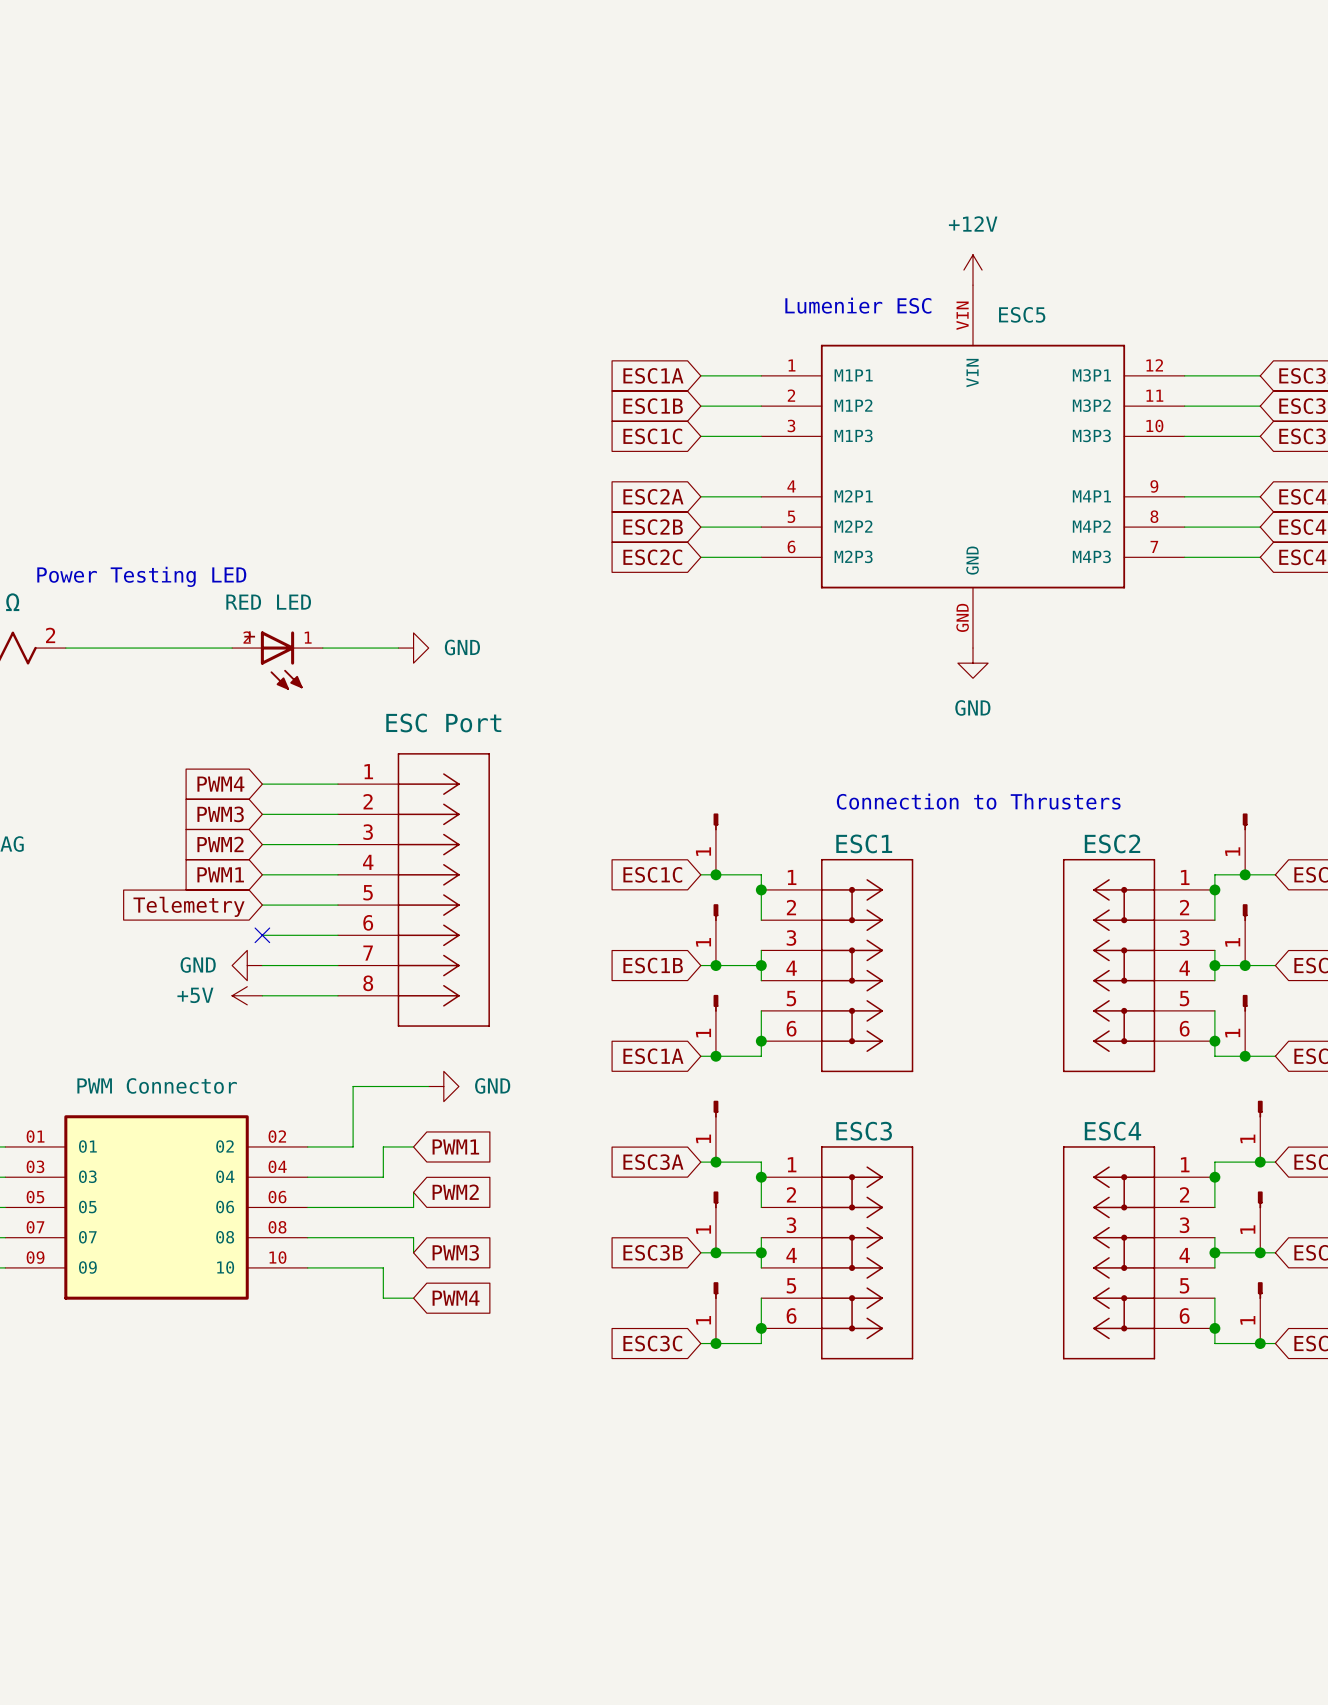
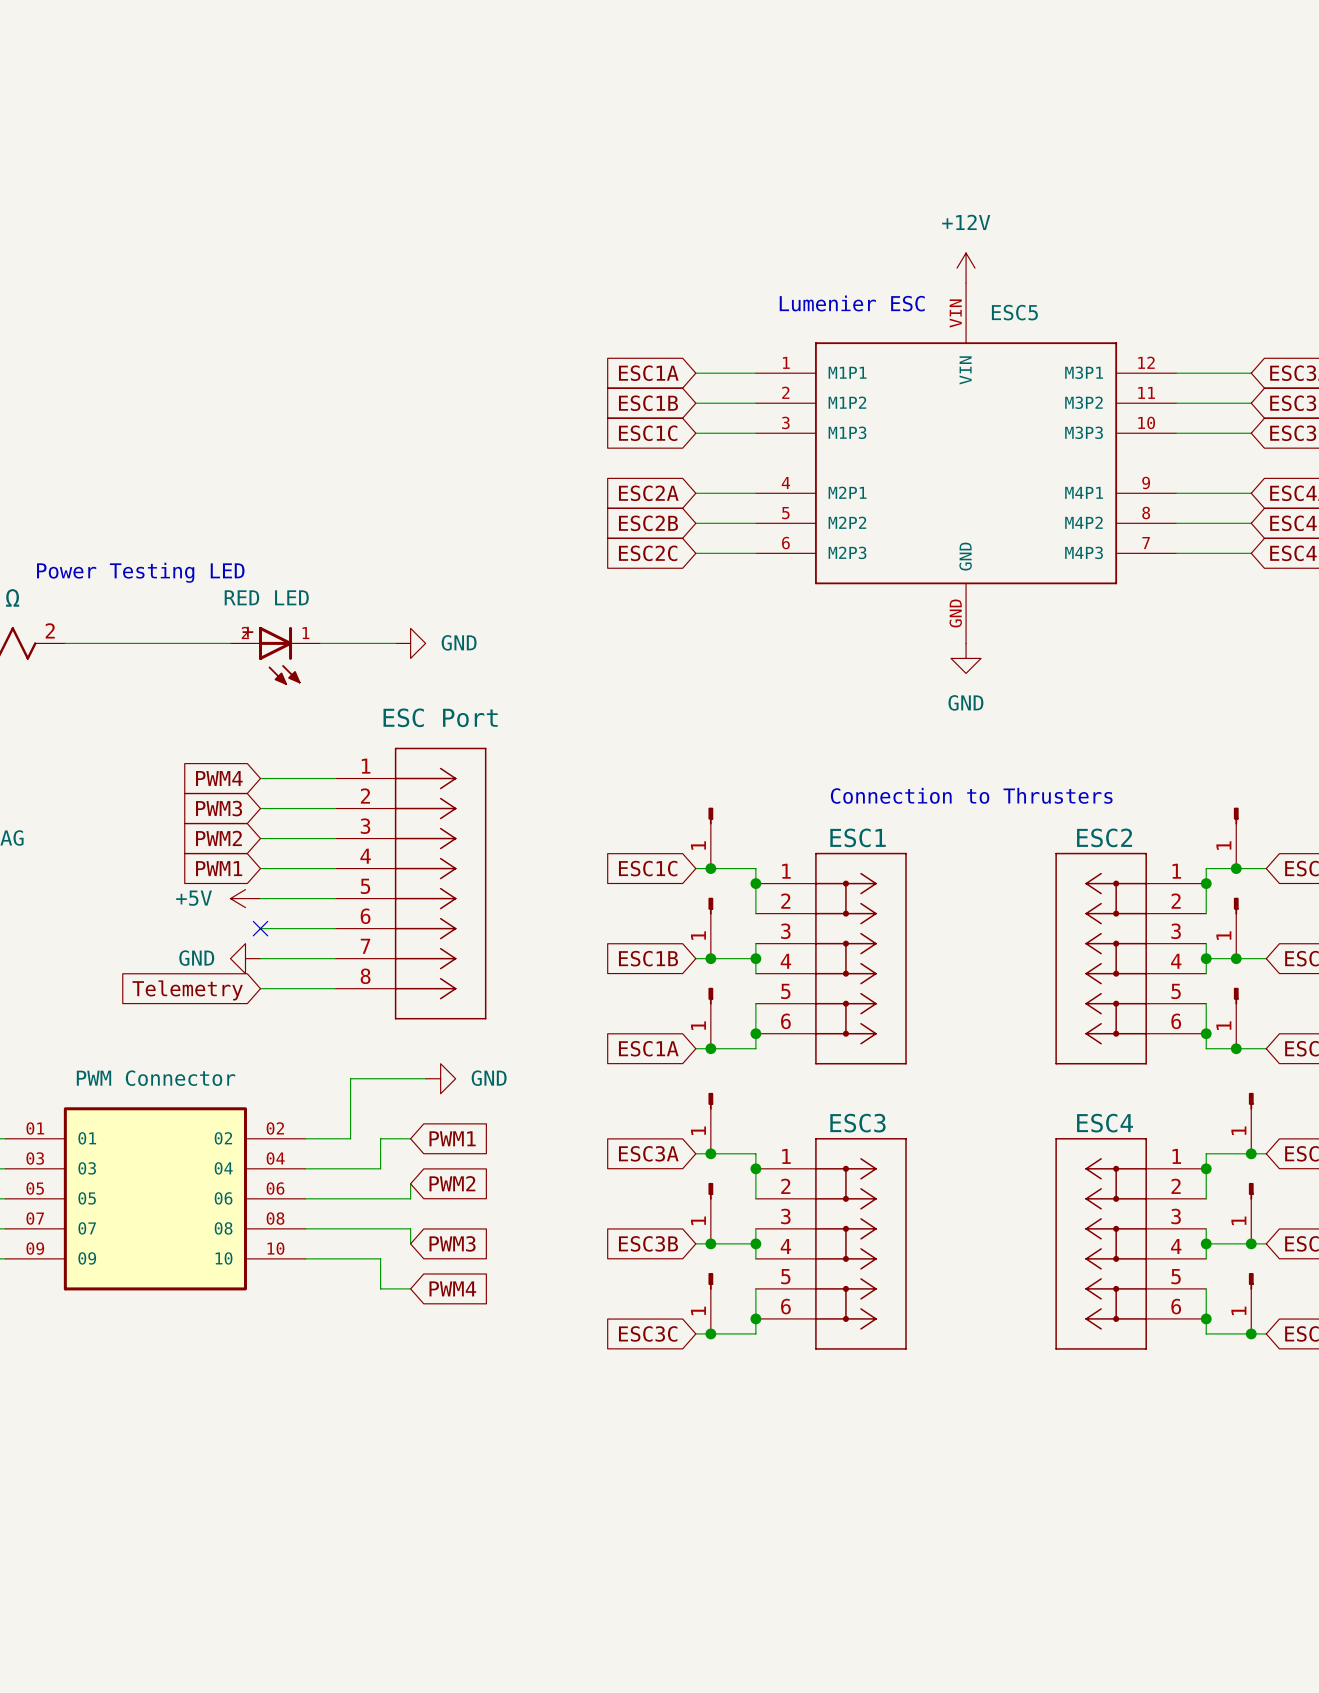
global label position: Telemetry (189, 906) -> Telemetry (187, 990)
power symbol position: +5V (247, 995) -> +5V (245, 898)

